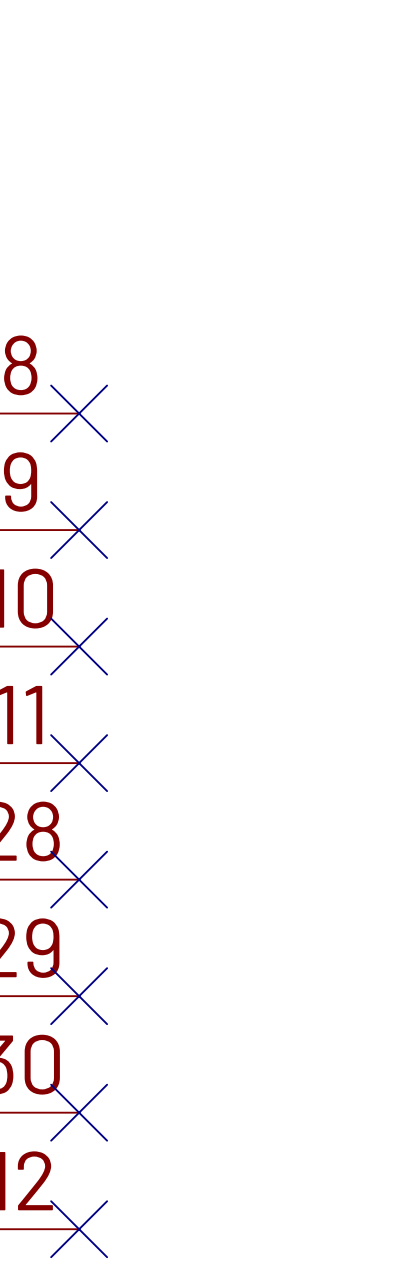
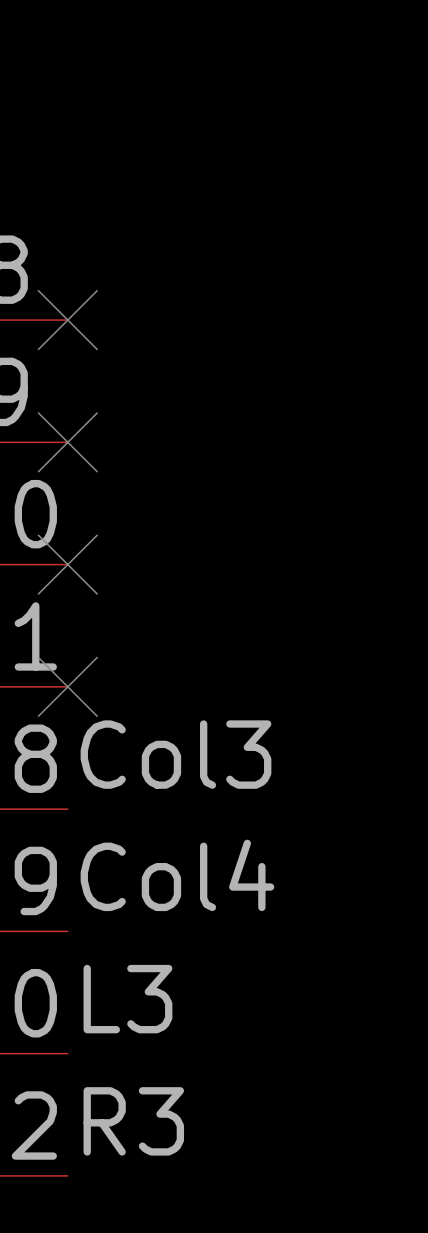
label: none -> Col3 (176, 754)
no-connect mark: (79, 879) -> none
label: none -> Col4 (177, 875)
no-connect mark: (79, 996) -> none
label: none -> L3 (127, 999)
no-connect mark: (79, 1112) -> none
label: none -> R3 (133, 1121)
no-connect mark: (79, 1229) -> none

